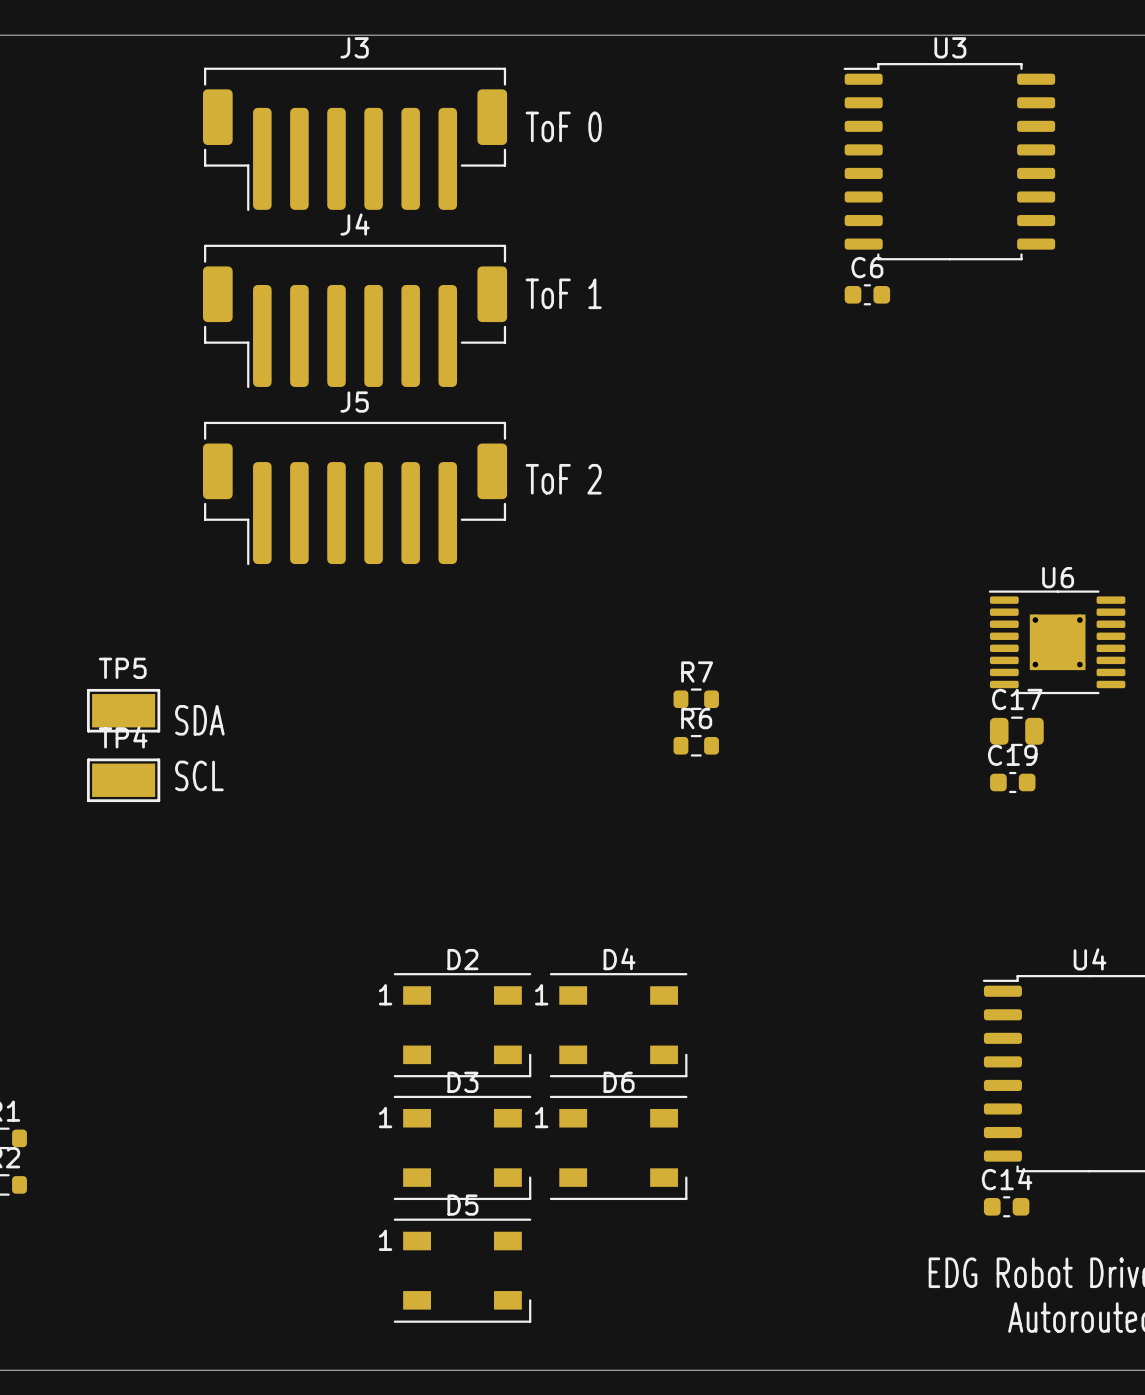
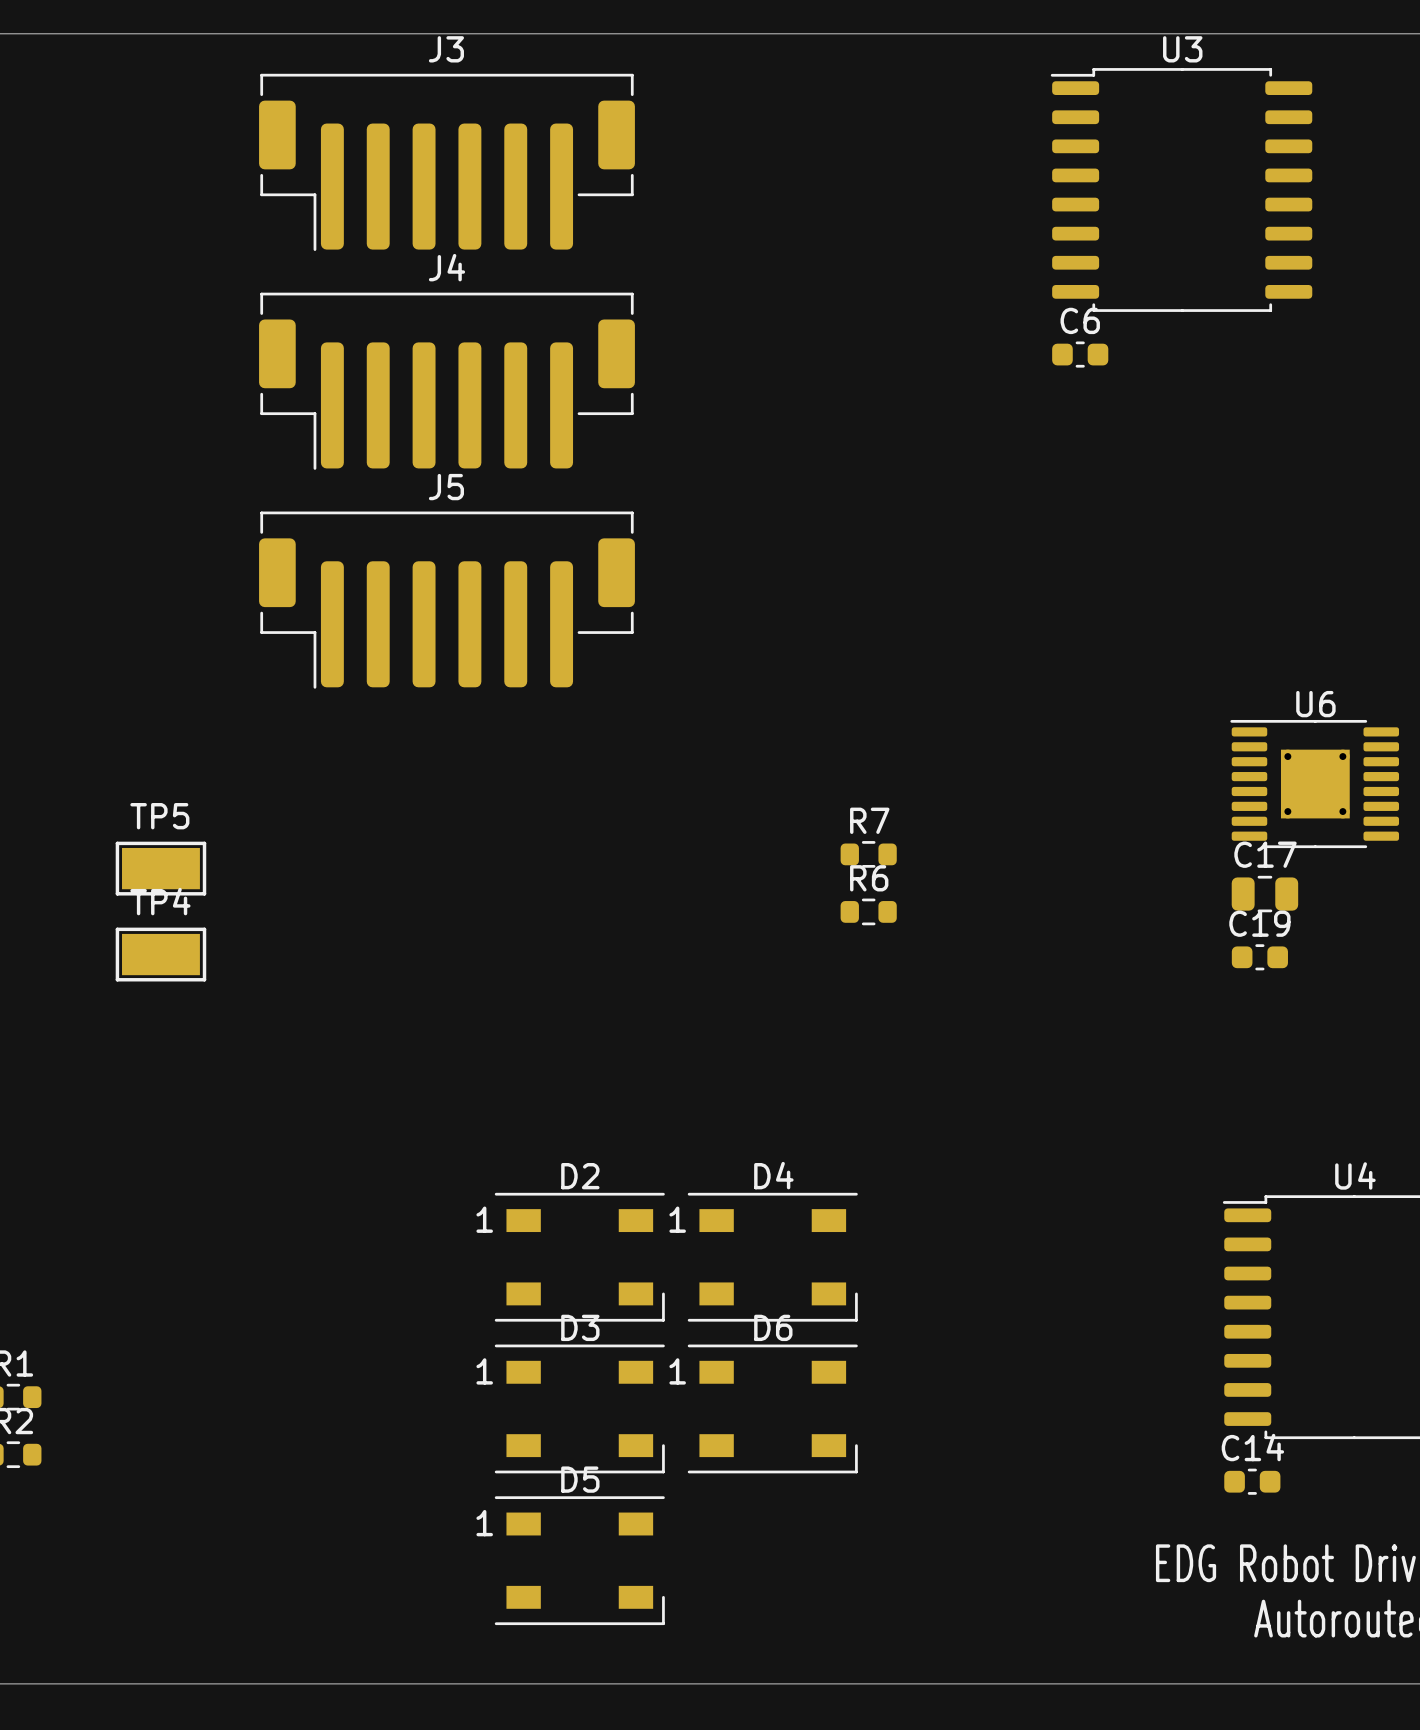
text: ToF 0 (563, 126) -> none
text: ToF 1 (563, 293) -> none
text: ToF 2 (563, 479) -> none
text: SDA (199, 720) -> none
text: SCL (199, 775) -> none

